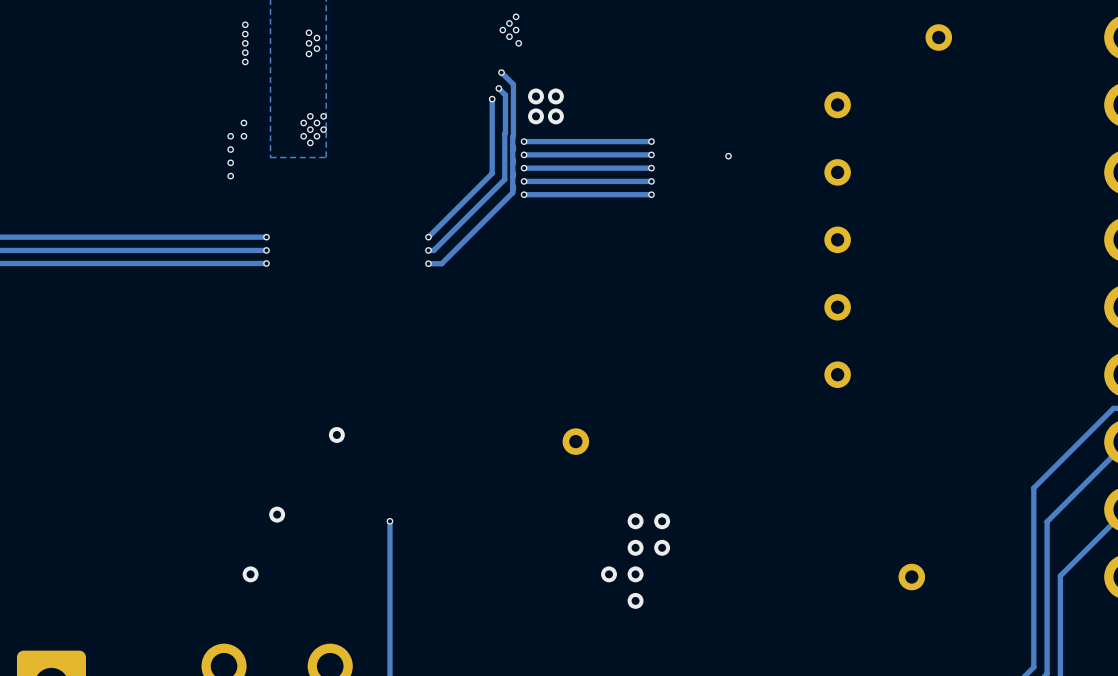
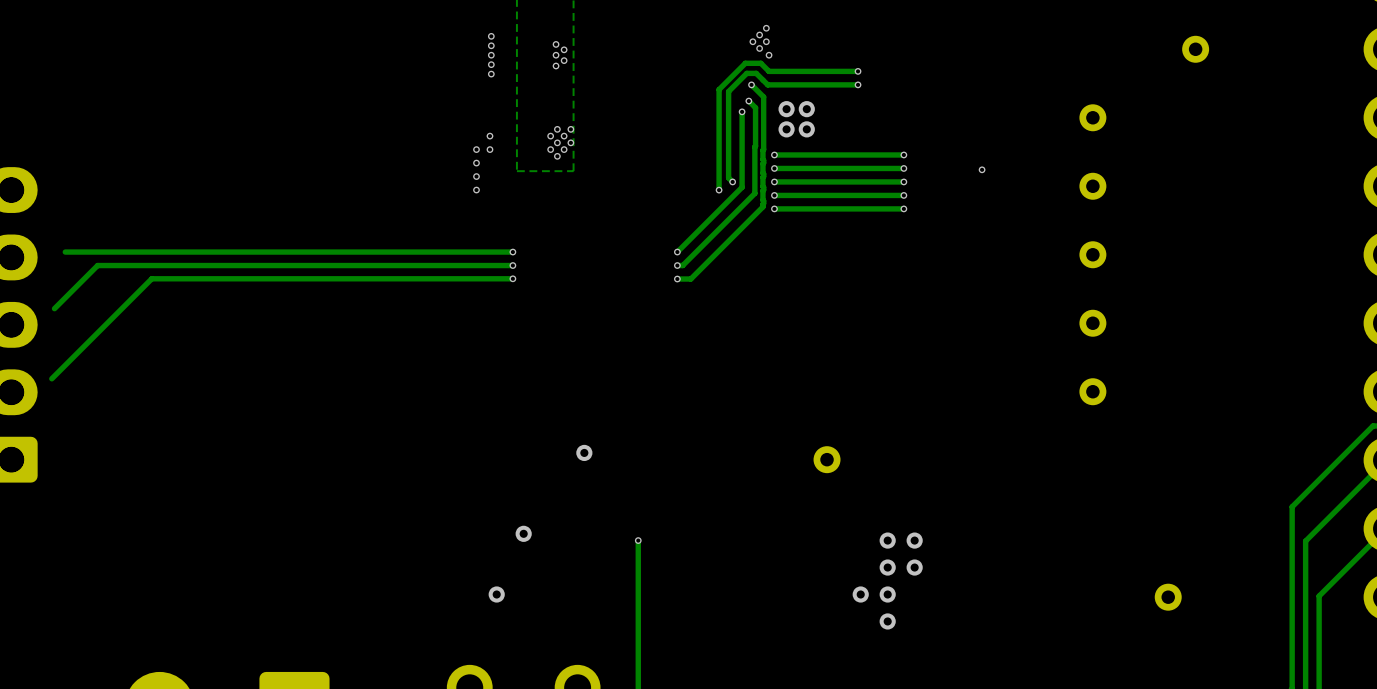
track: none -> (858, 71) (768, 71) (760, 63) (745, 63) (719, 89) (719, 190)
via: none -> (858, 71)
track: none -> (858, 84) (767, 84) (756, 73) (746, 73) (728, 91) (728, 177) (732, 181)
via: none -> (858, 84)
via: none -> (732, 181)
via: none -> (719, 190)

